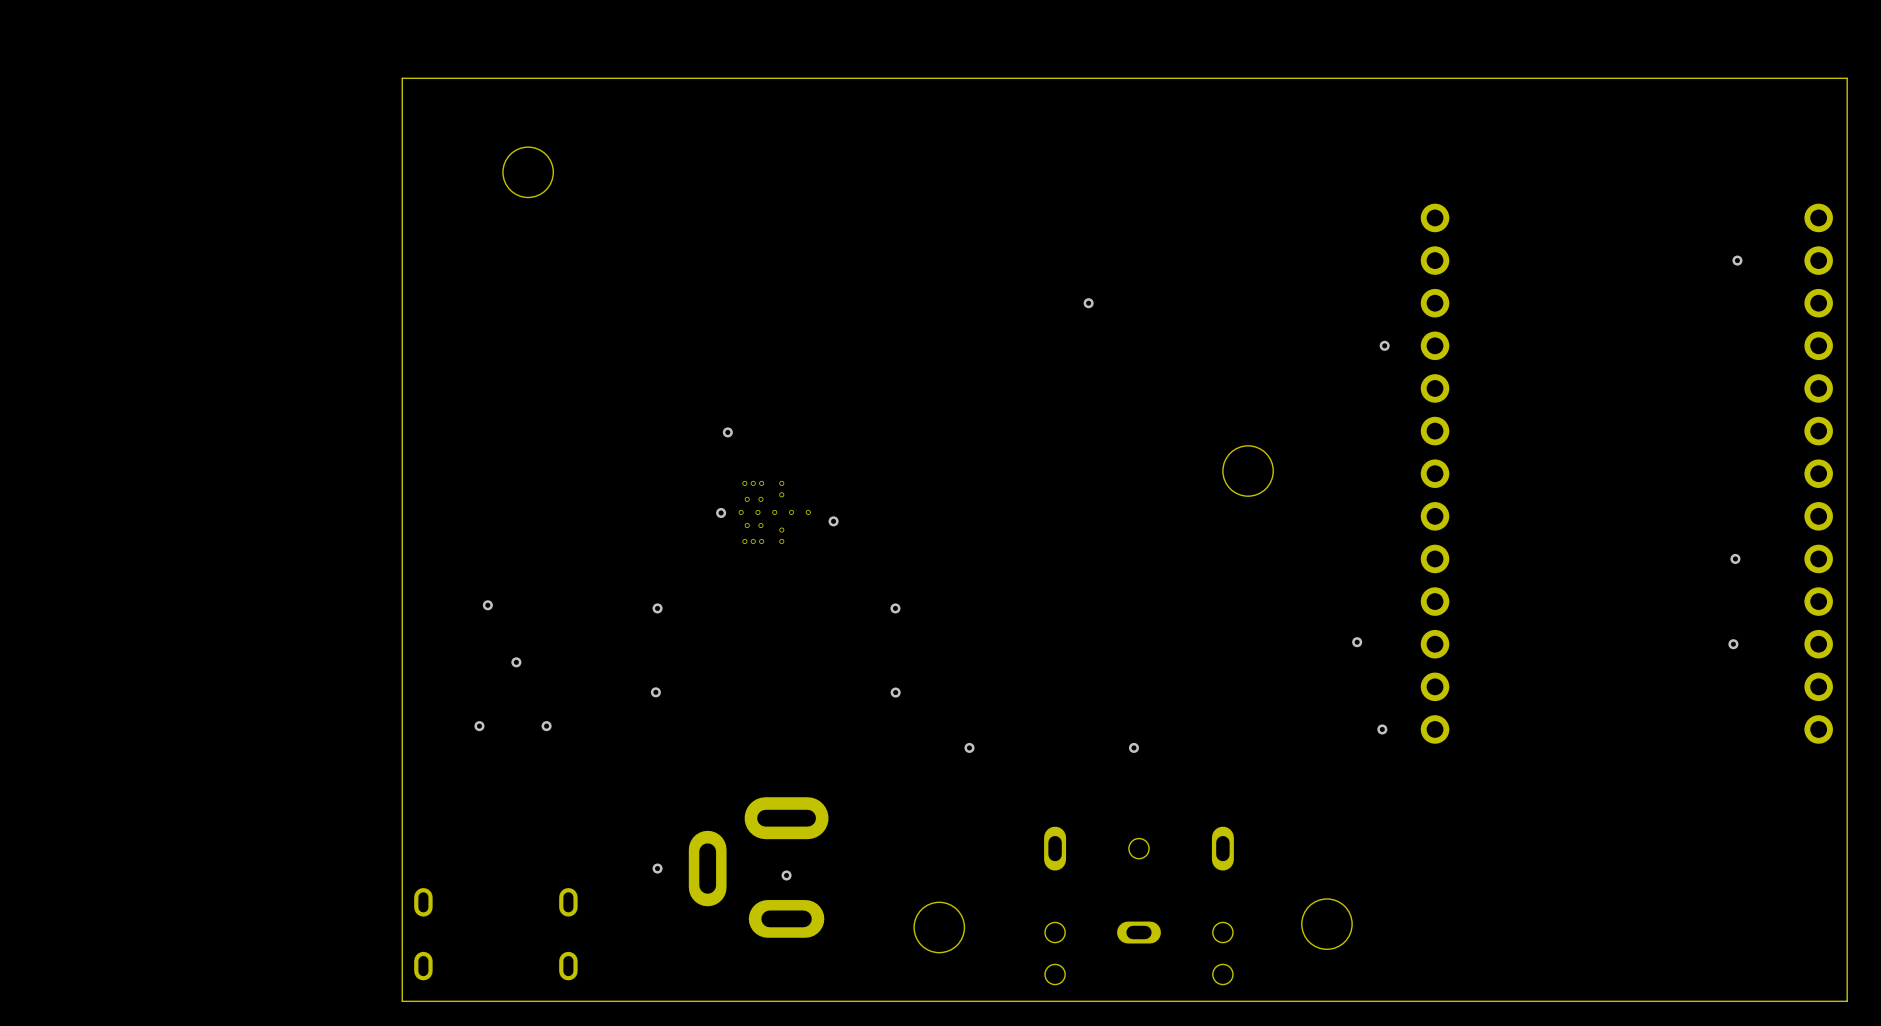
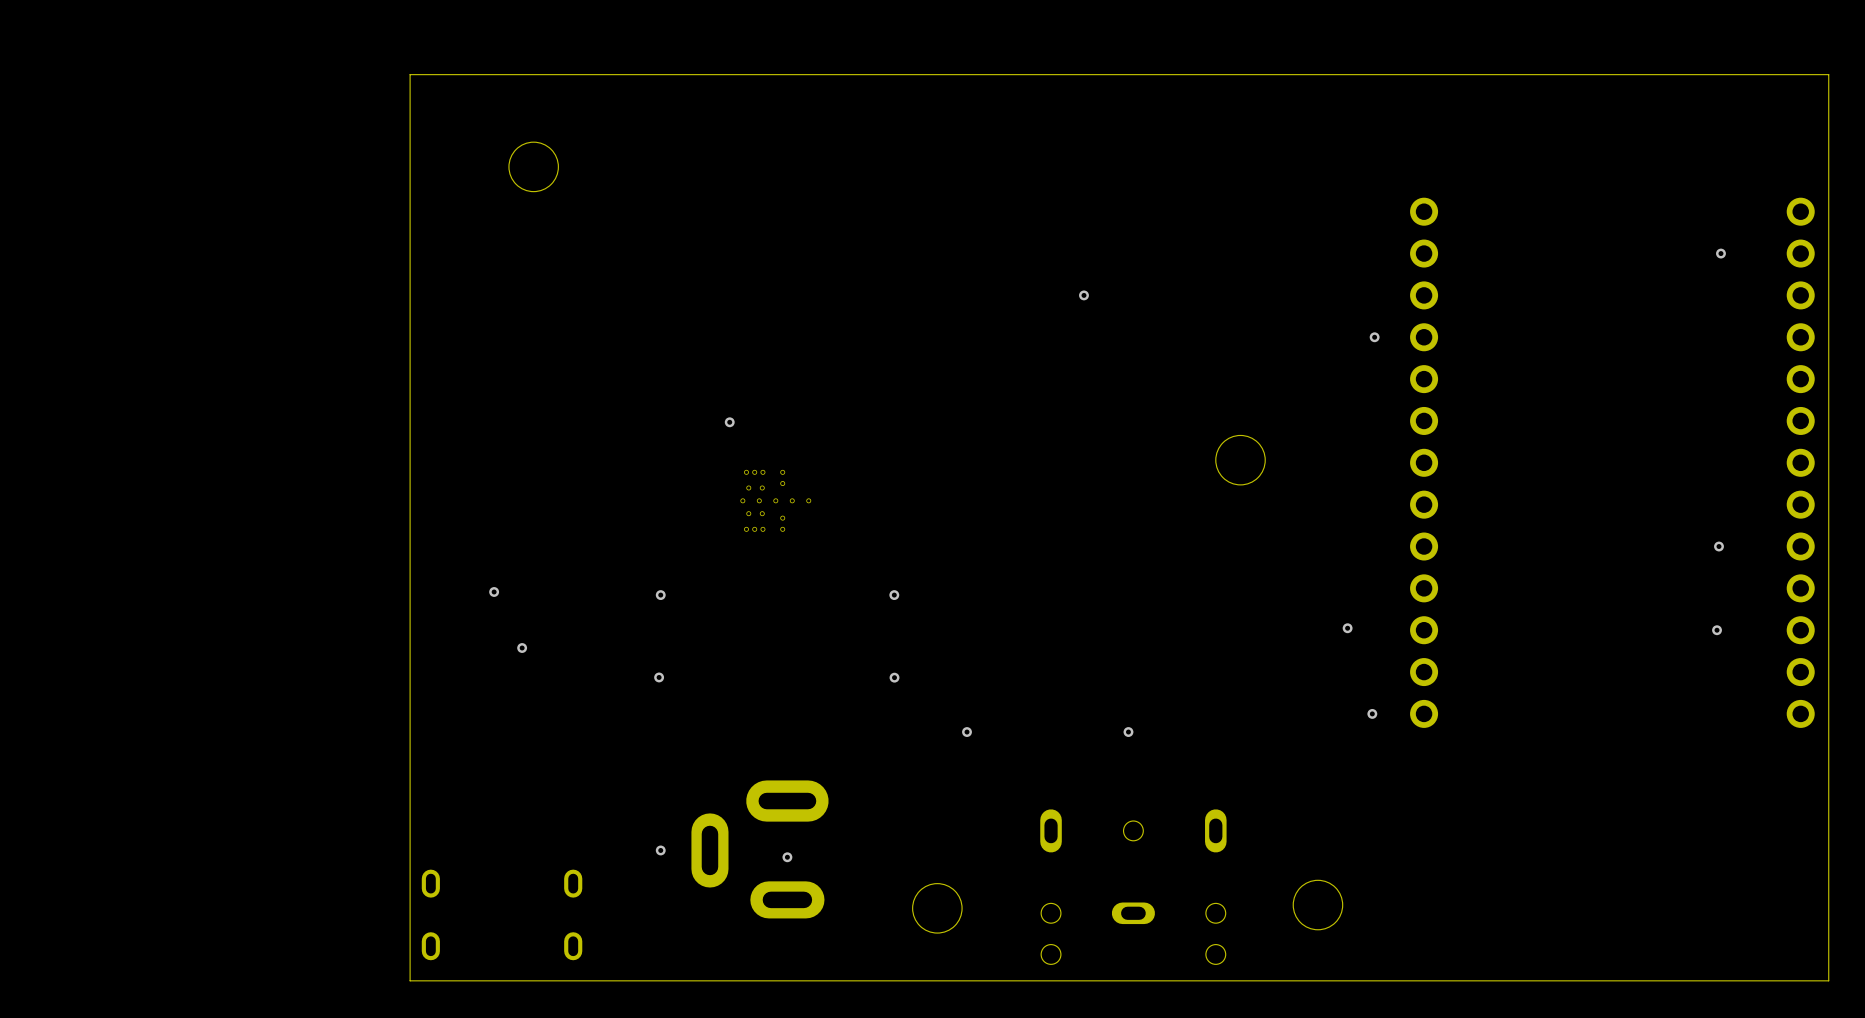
via: (721, 512) -> none
via: (833, 521) -> none
via: (479, 726) -> none
via: (546, 726) -> none

